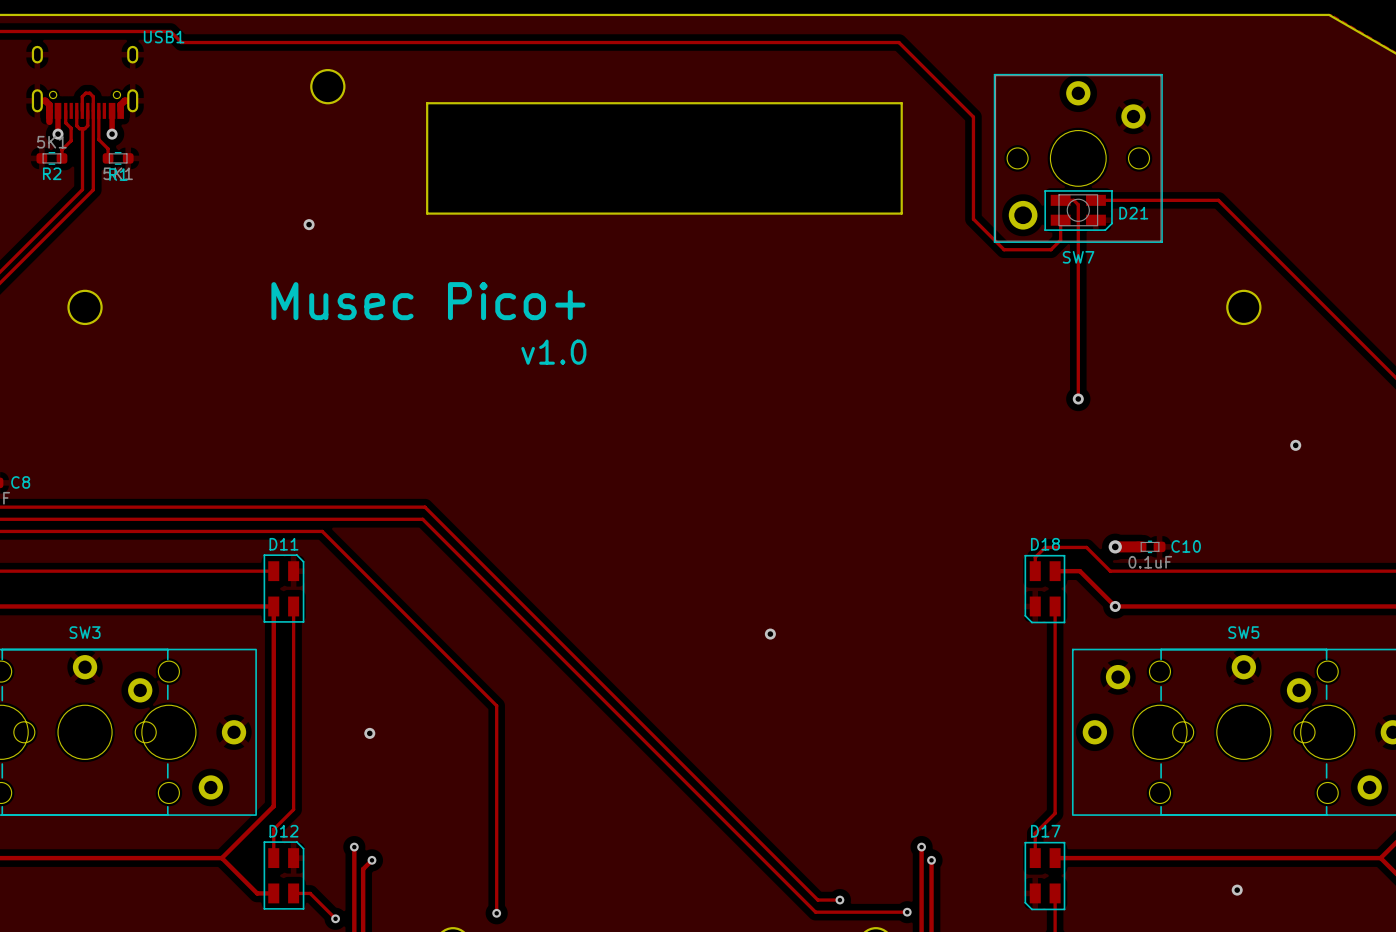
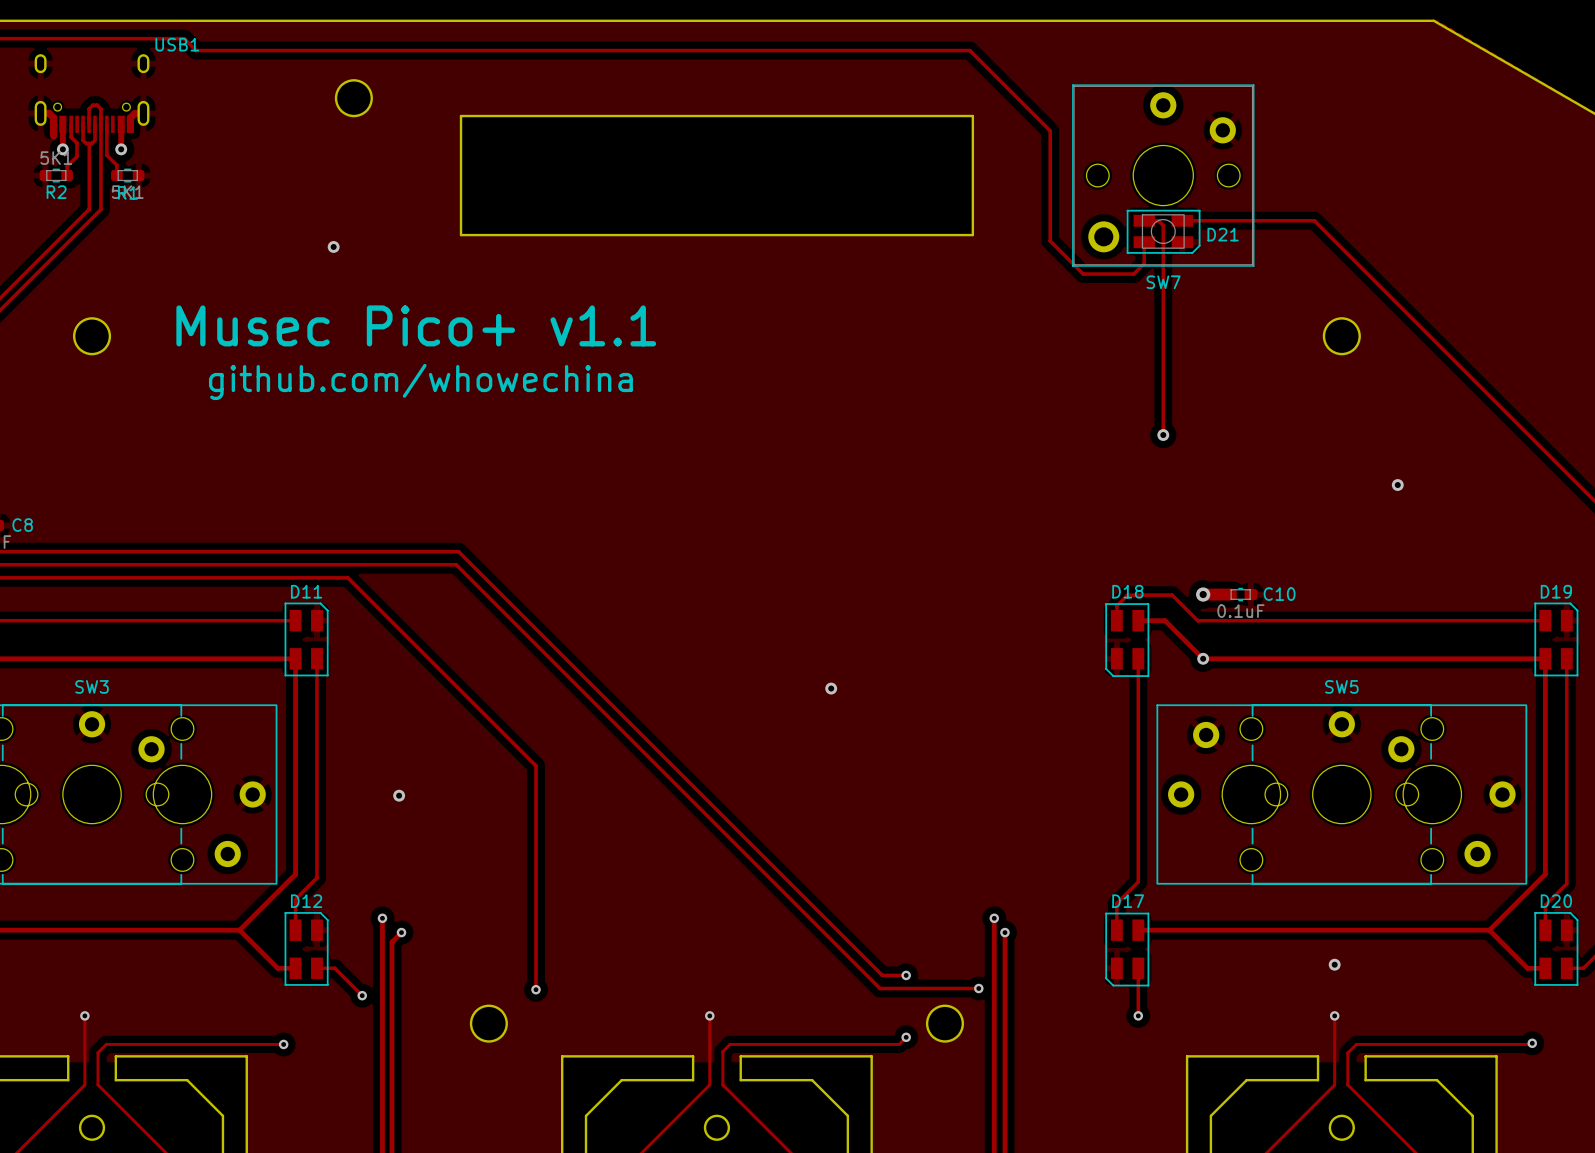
text: Musec Pico+ (428, 301) -> Musec Pico+ v1.1 (416, 325)
text: none -> github.com/whowechina (420, 381)
text: v1.0 (553, 352) -> none

